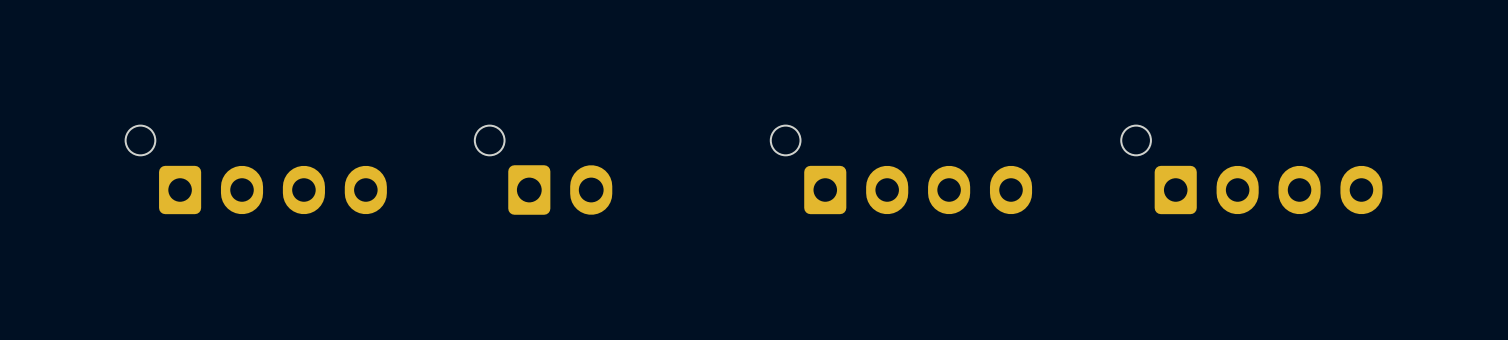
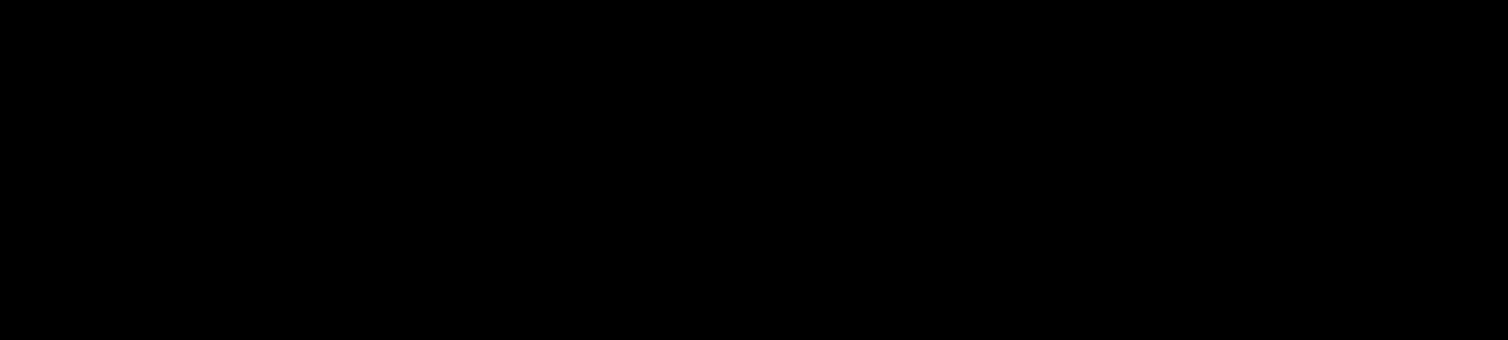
part: (256, 169) -> none
part: (901, 169) -> none
part: (1251, 169) -> none
part: (543, 170) -> none

